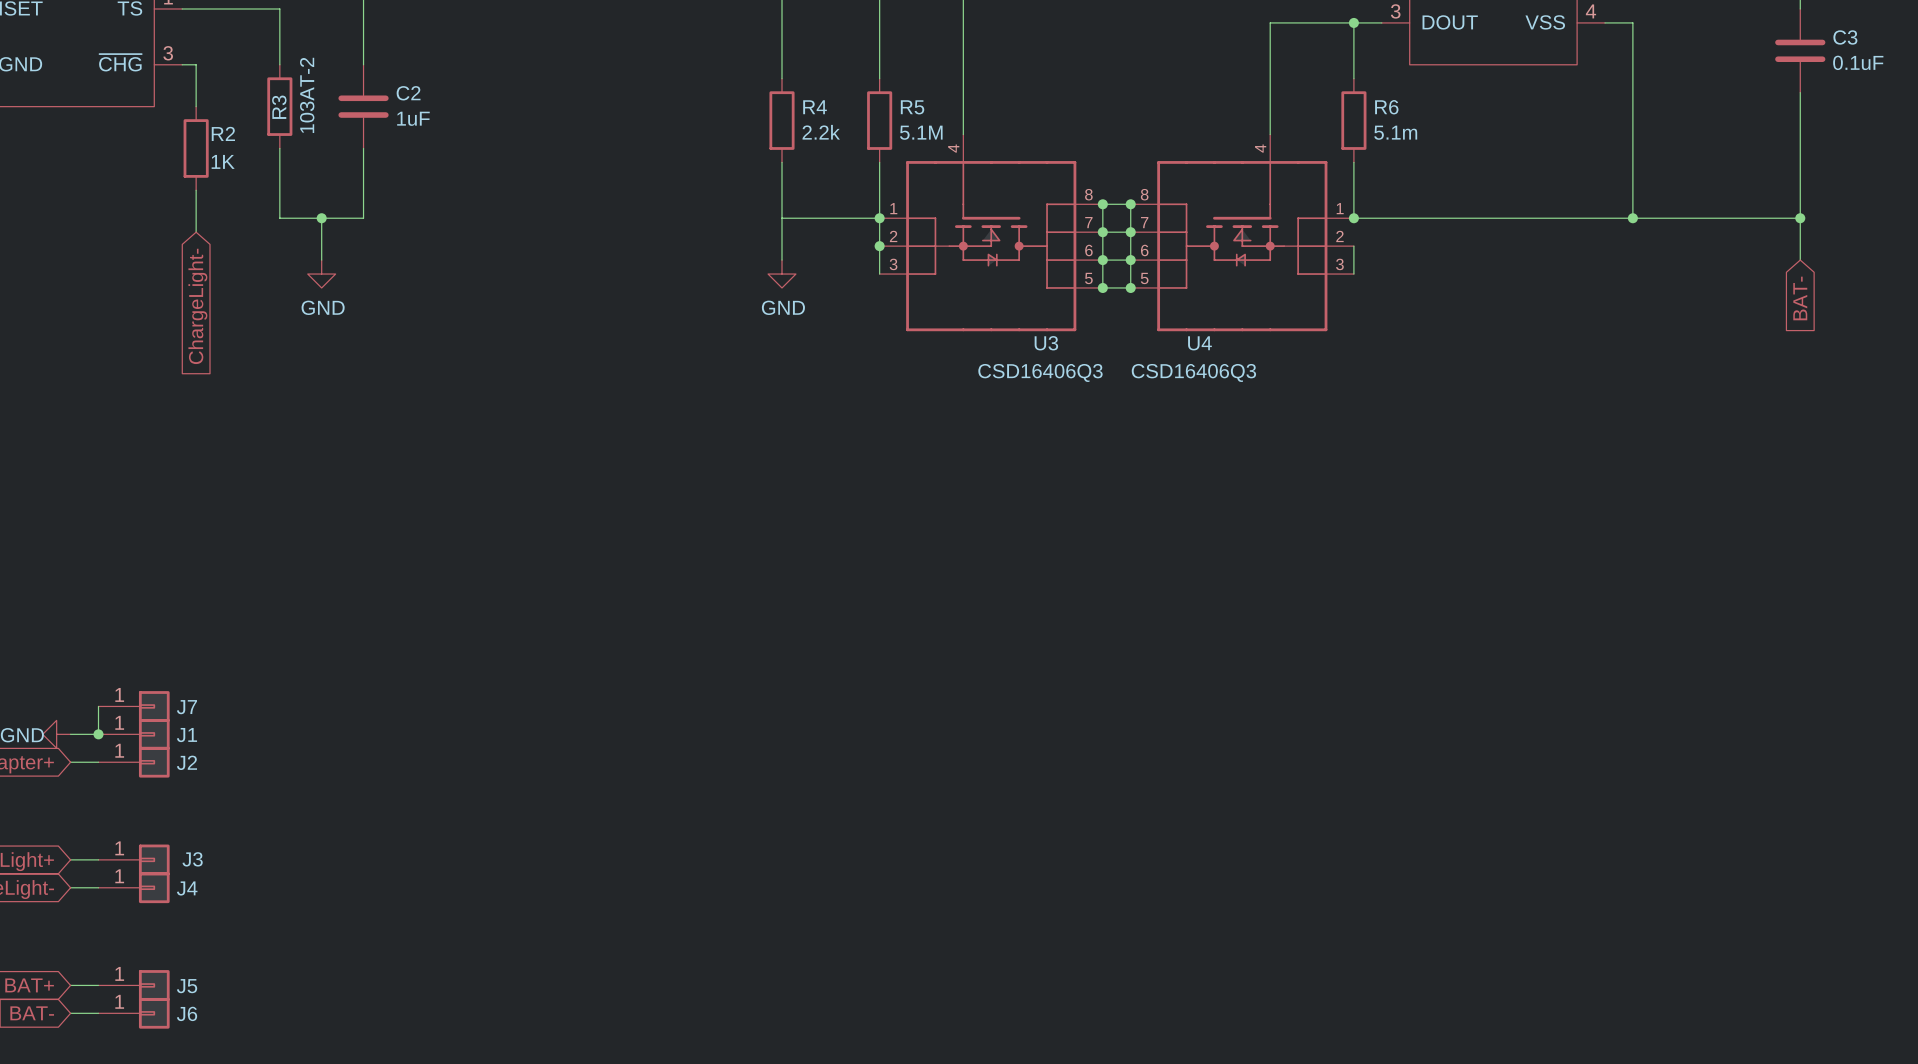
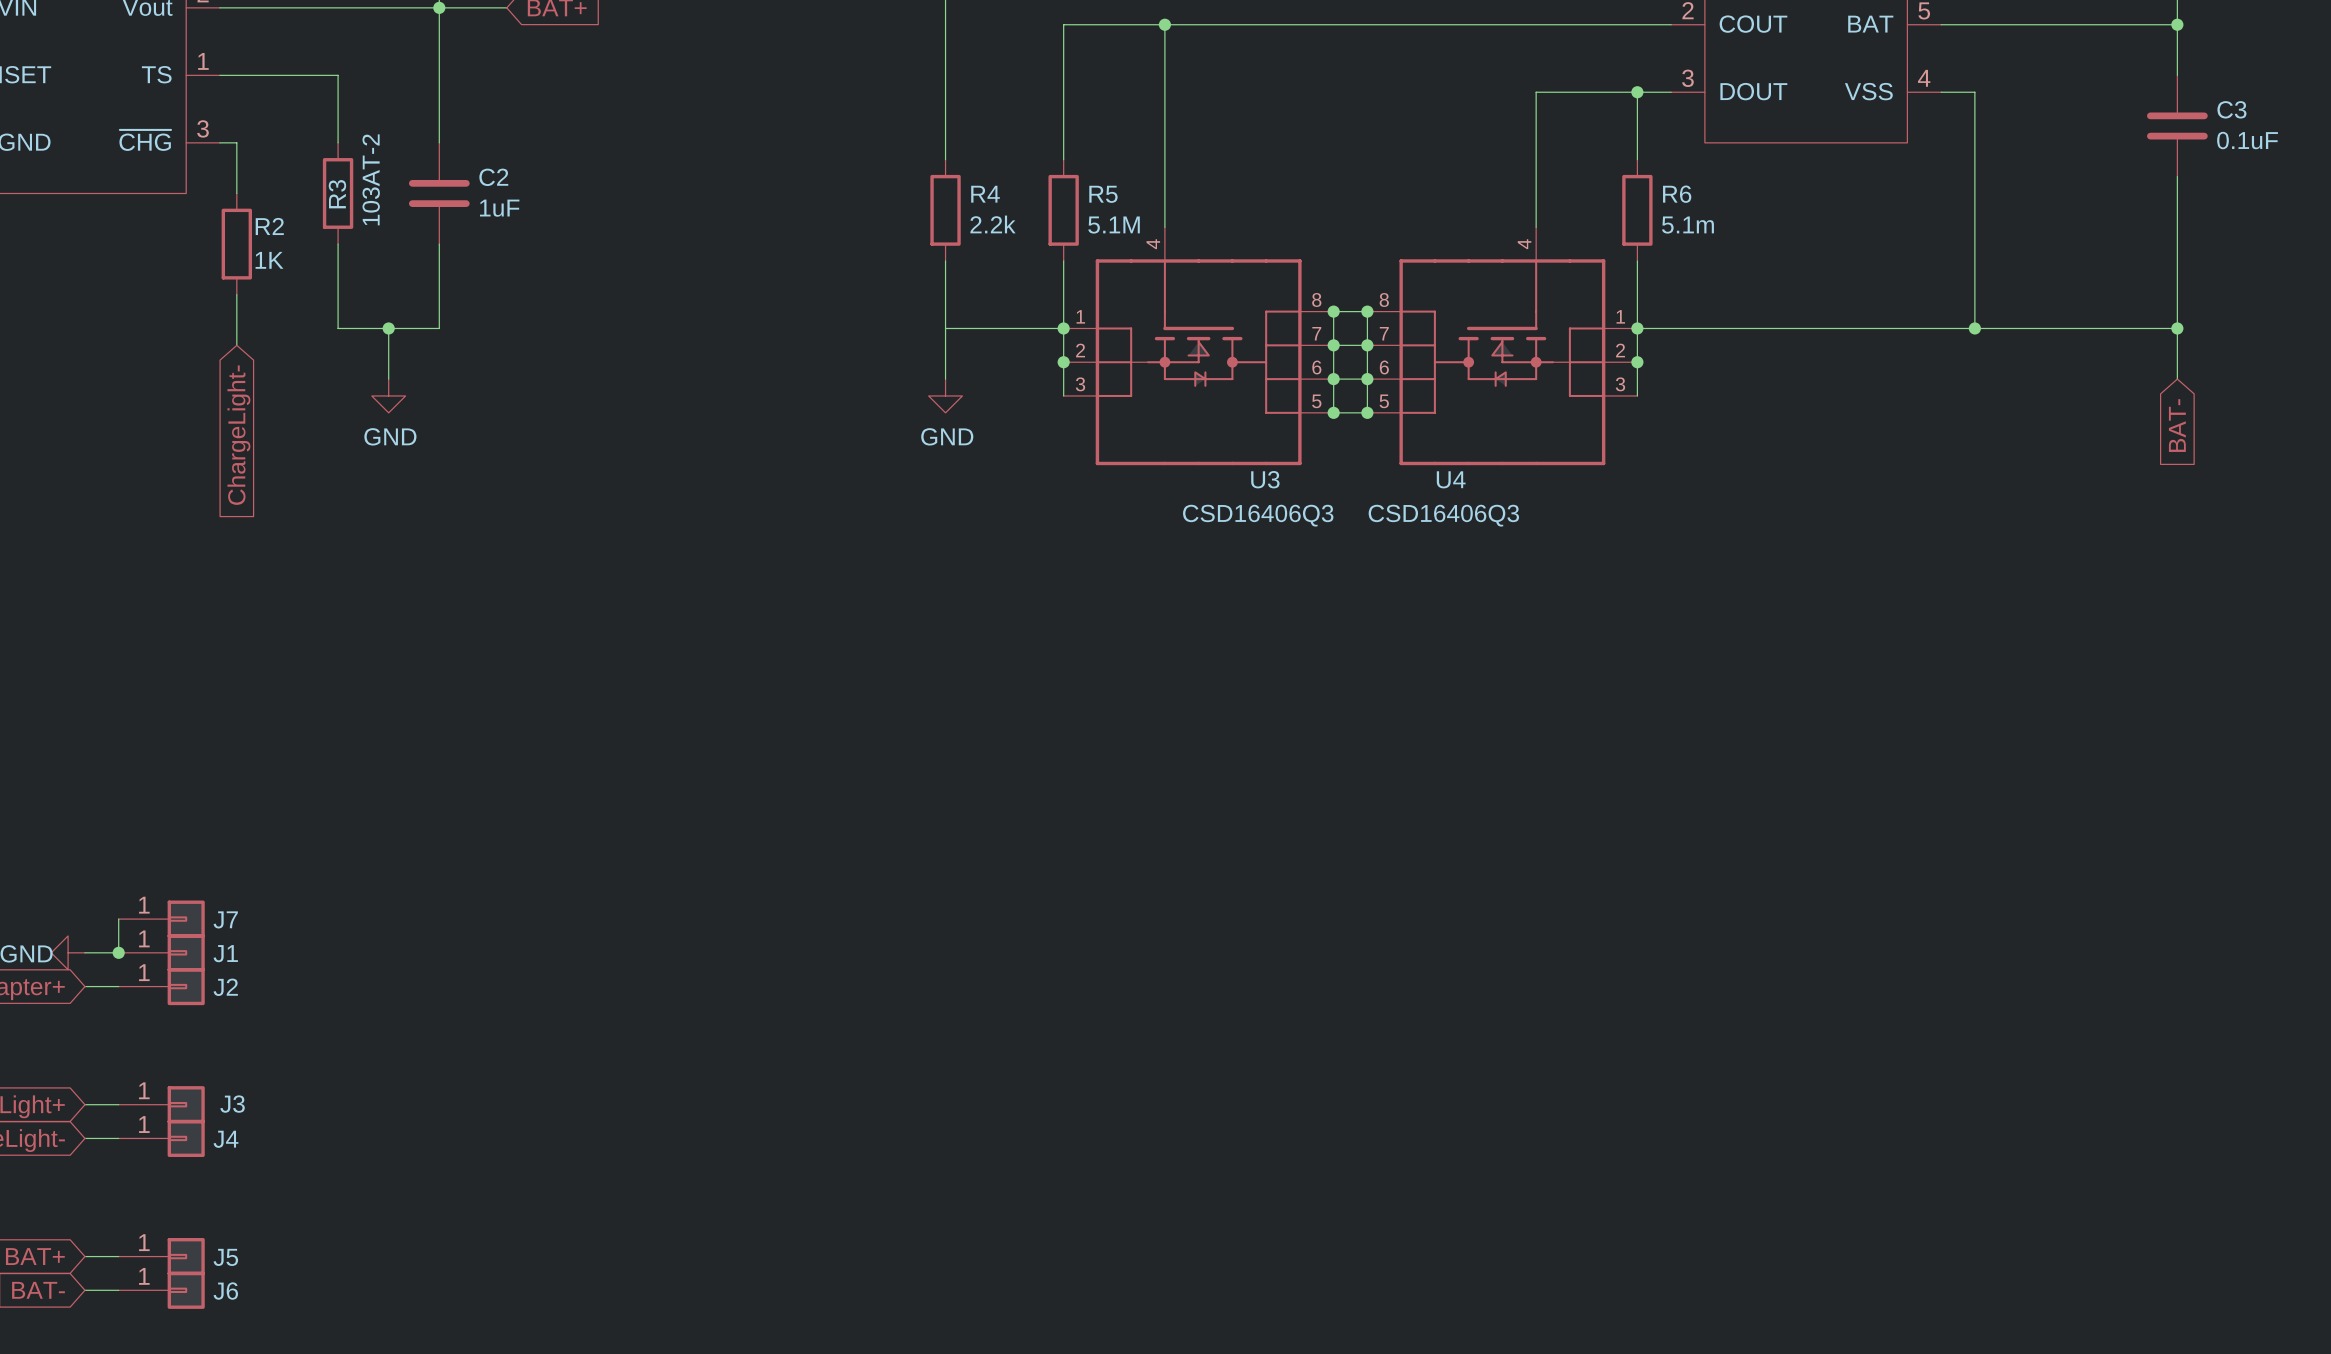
wire: none -> (1637, 328) (1637, 362)
junction: none -> (1637, 362)

